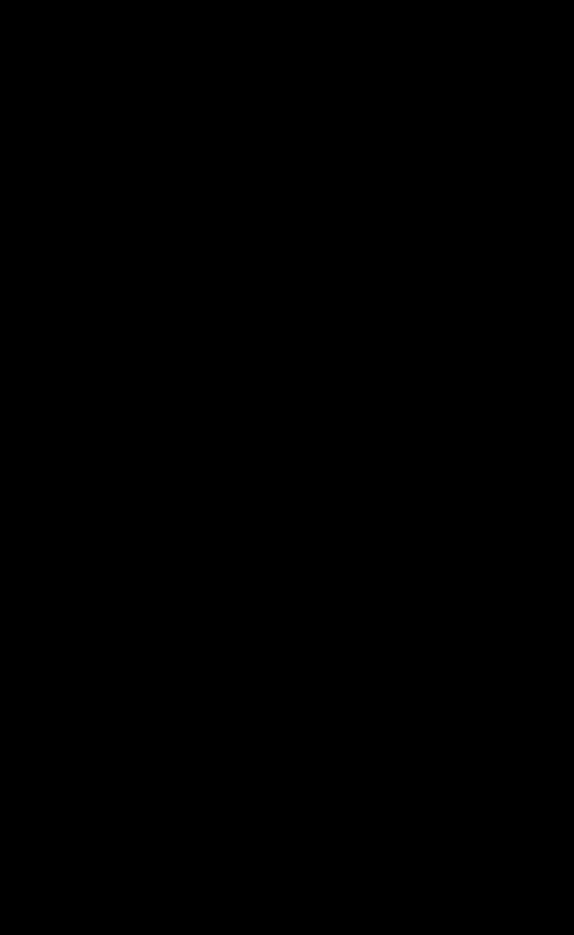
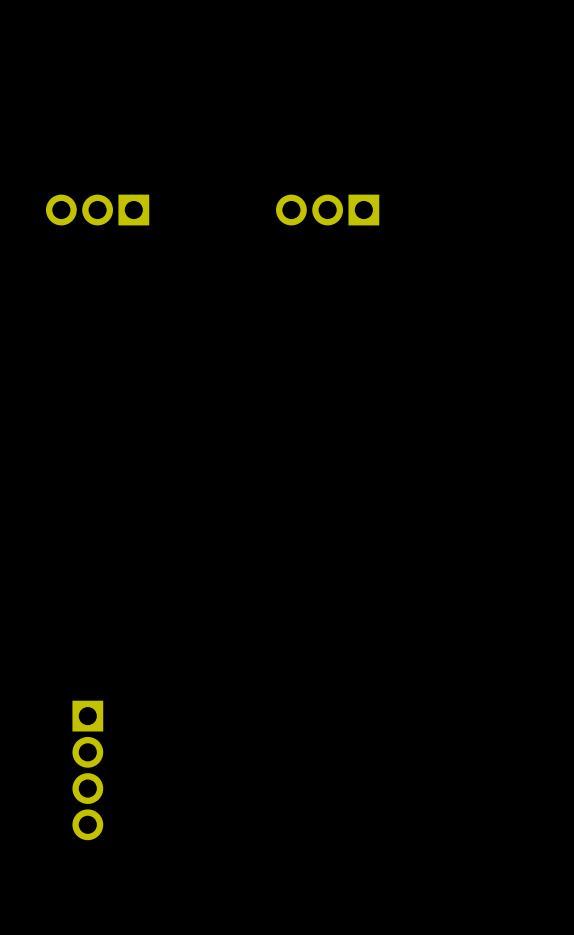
part: none -> (97, 210)
part: none -> (327, 210)
part: none -> (87, 770)

